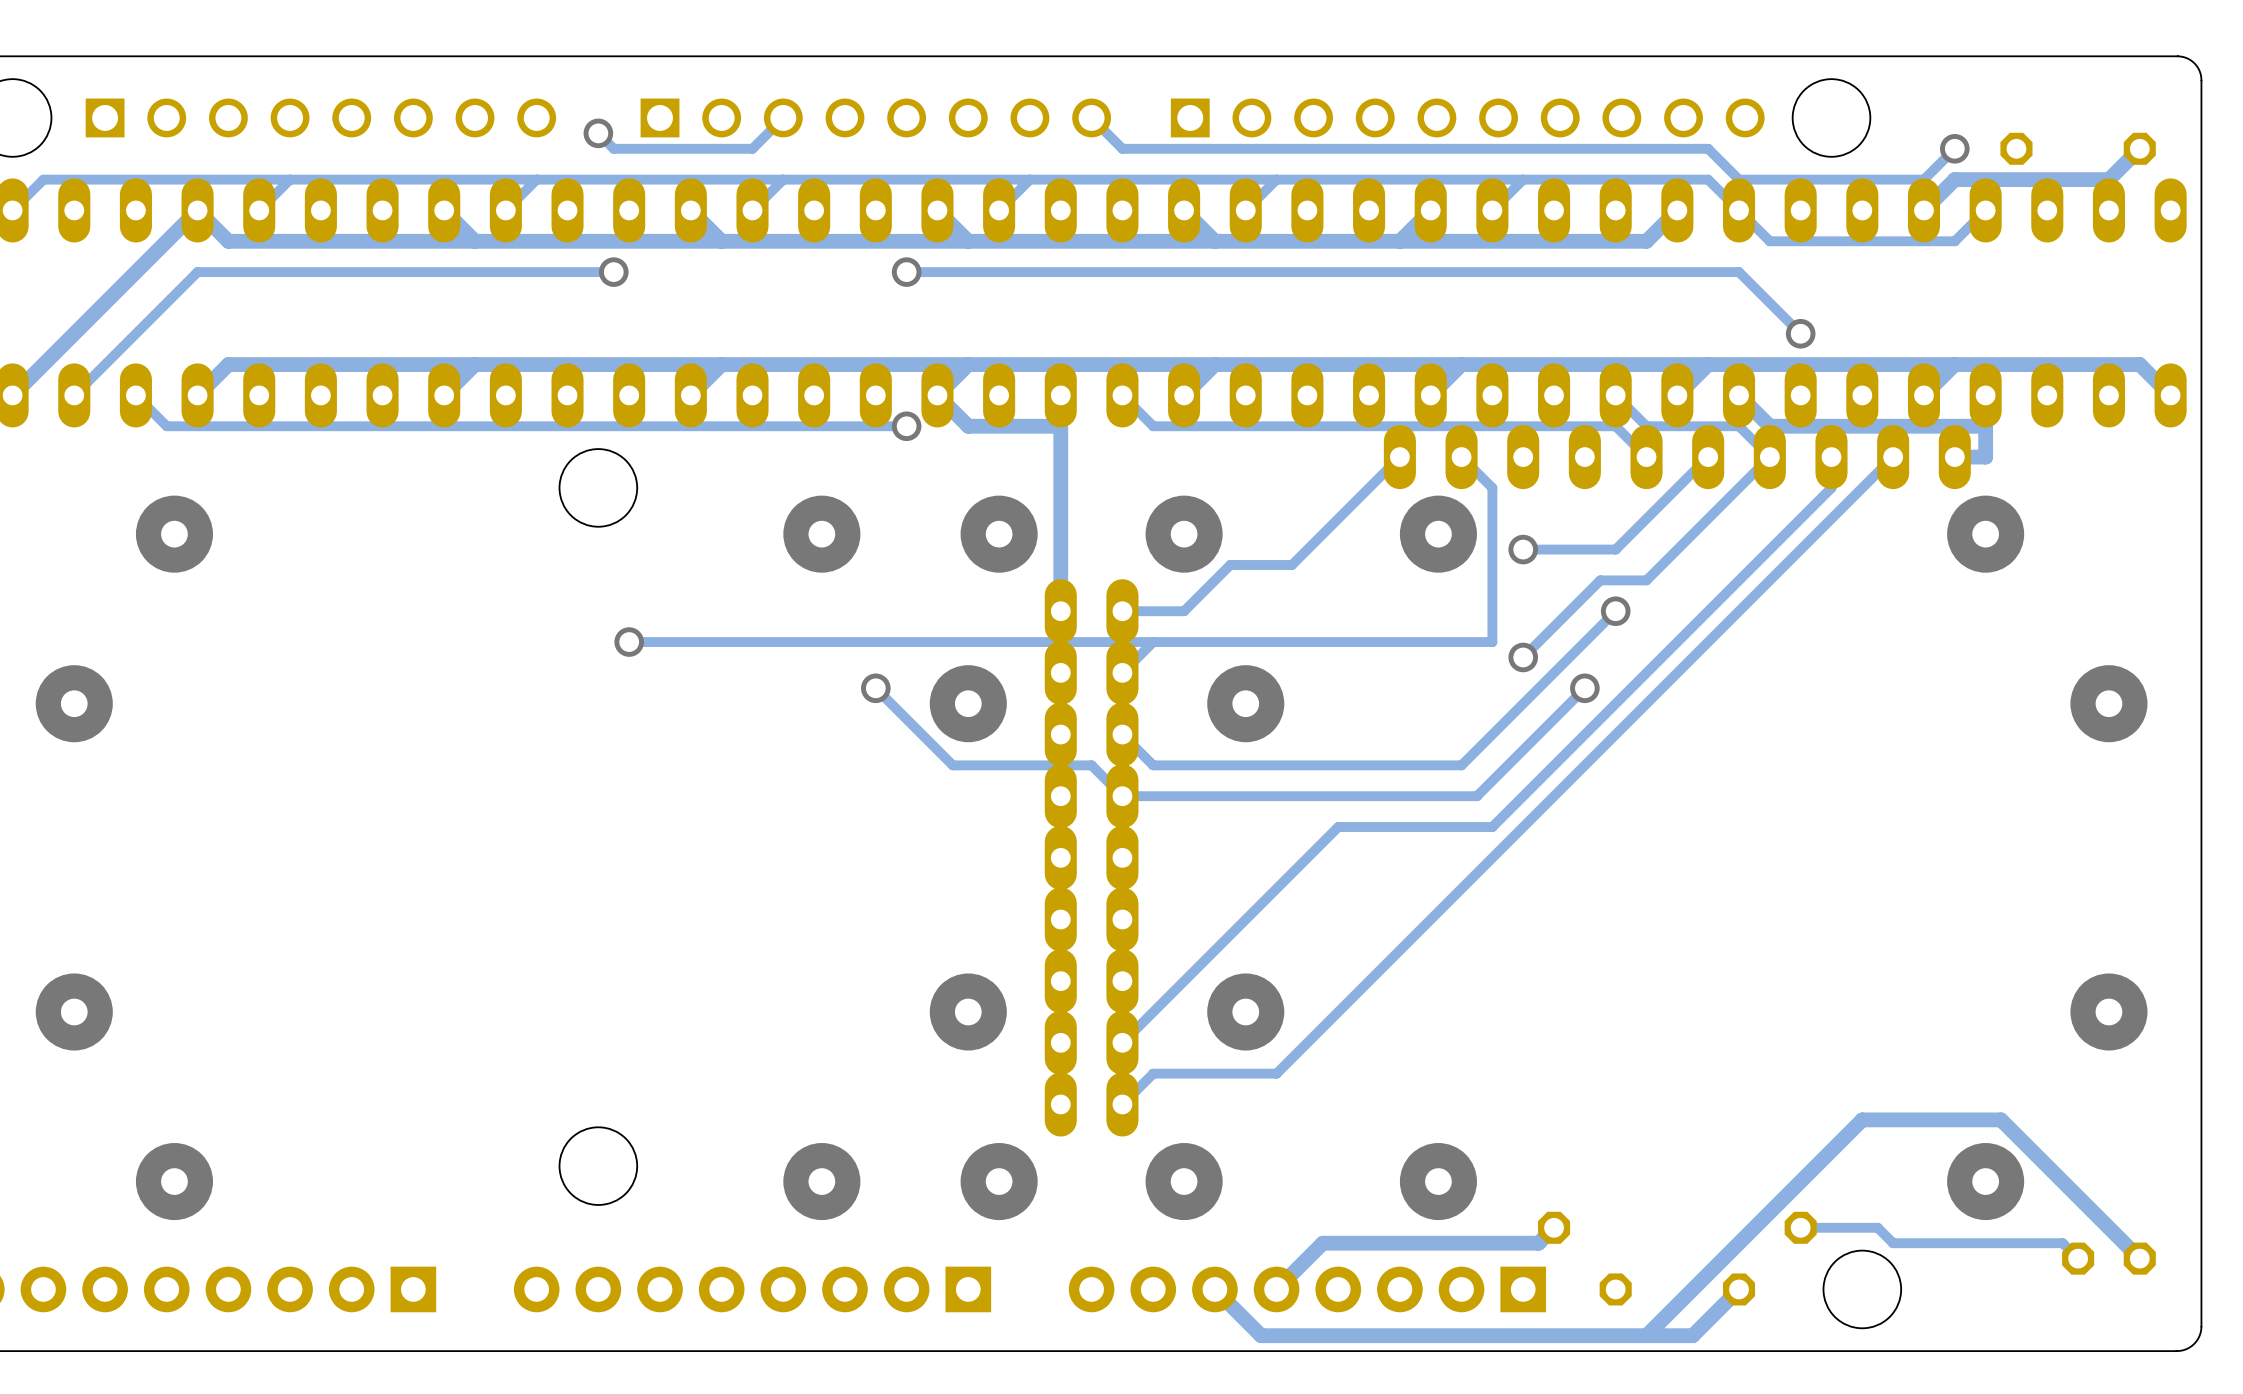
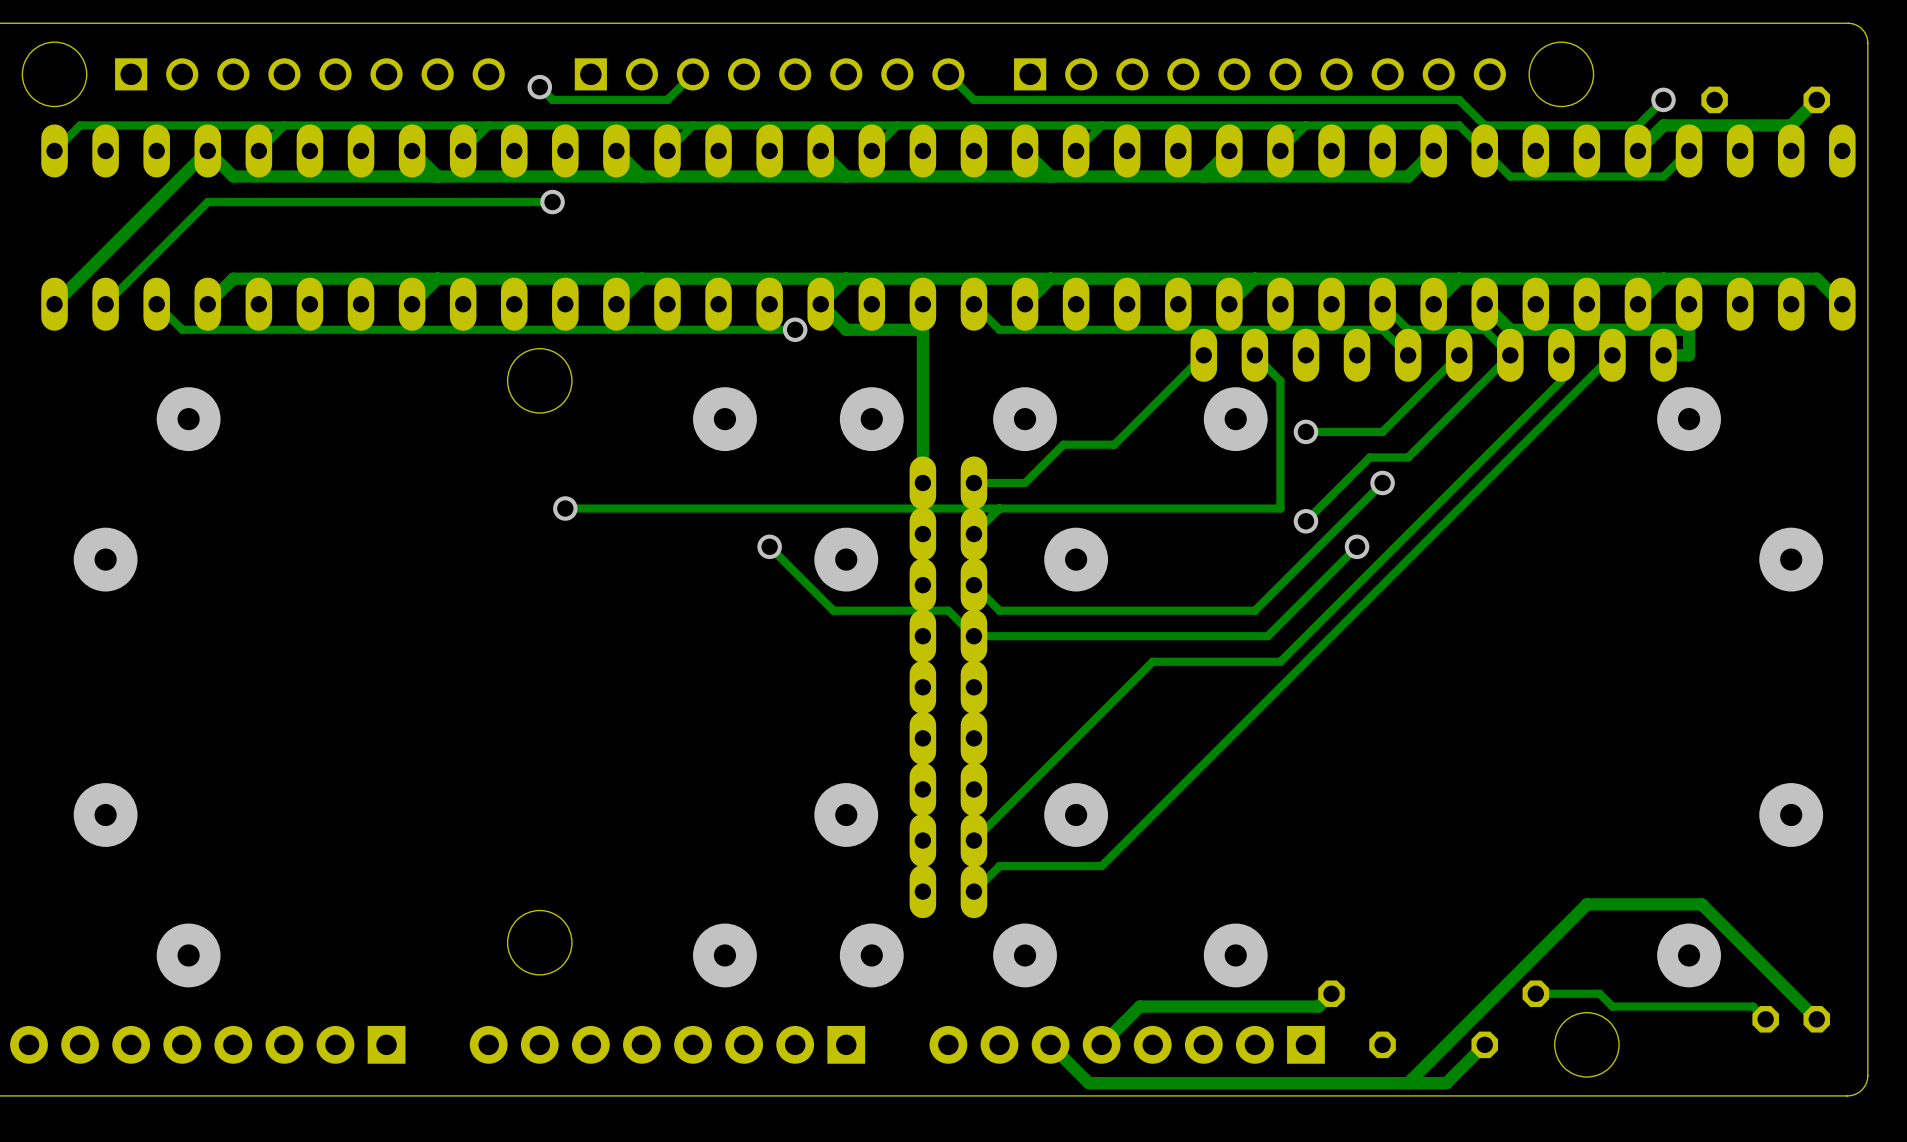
track: (906, 272) (1739, 272) (1800, 333) -> none
via: (906, 272) -> none
via: (1800, 333) -> none

